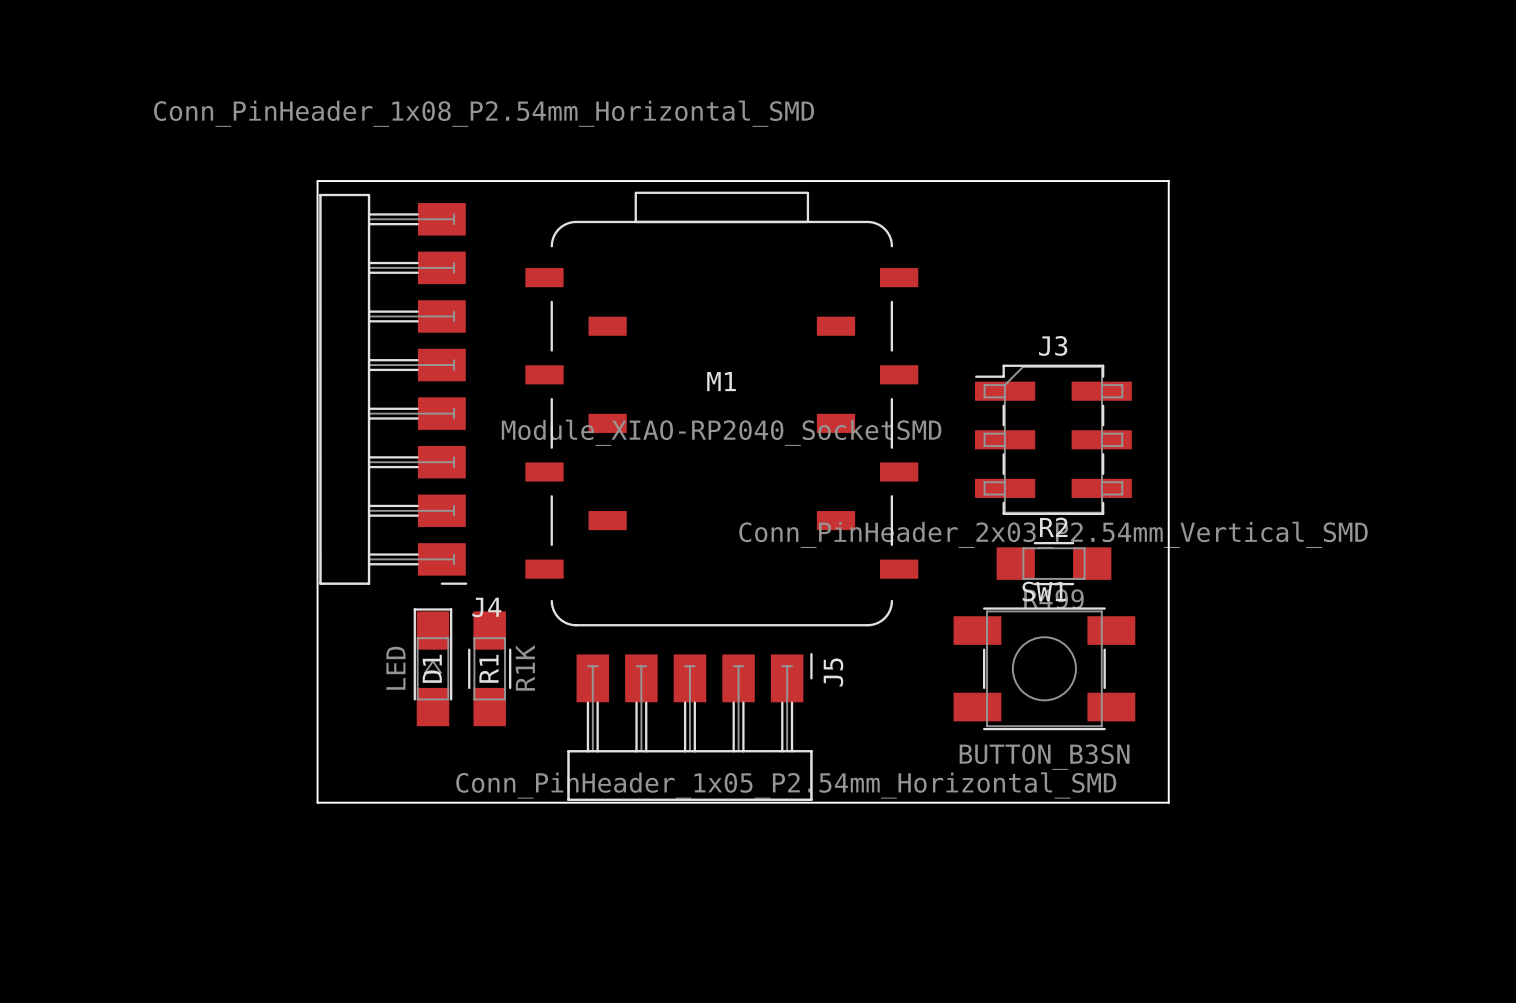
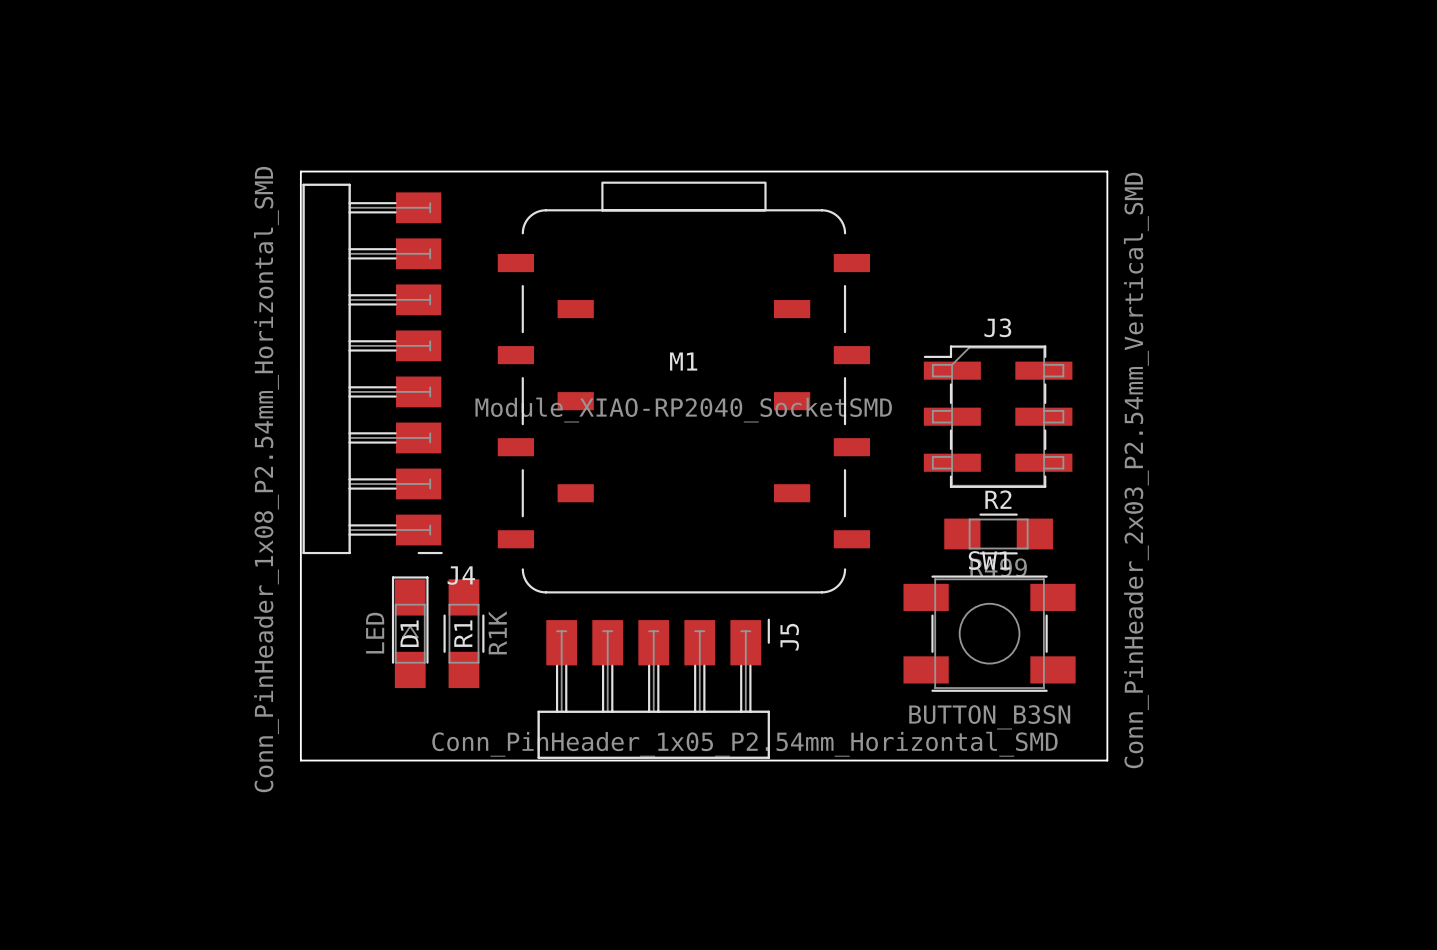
J4 value rotation: 0° (484, 113) -> 90° counterclockwise (266, 479)
J3 value rotation: 0° (1053, 534) -> 90° counterclockwise (1136, 470)

